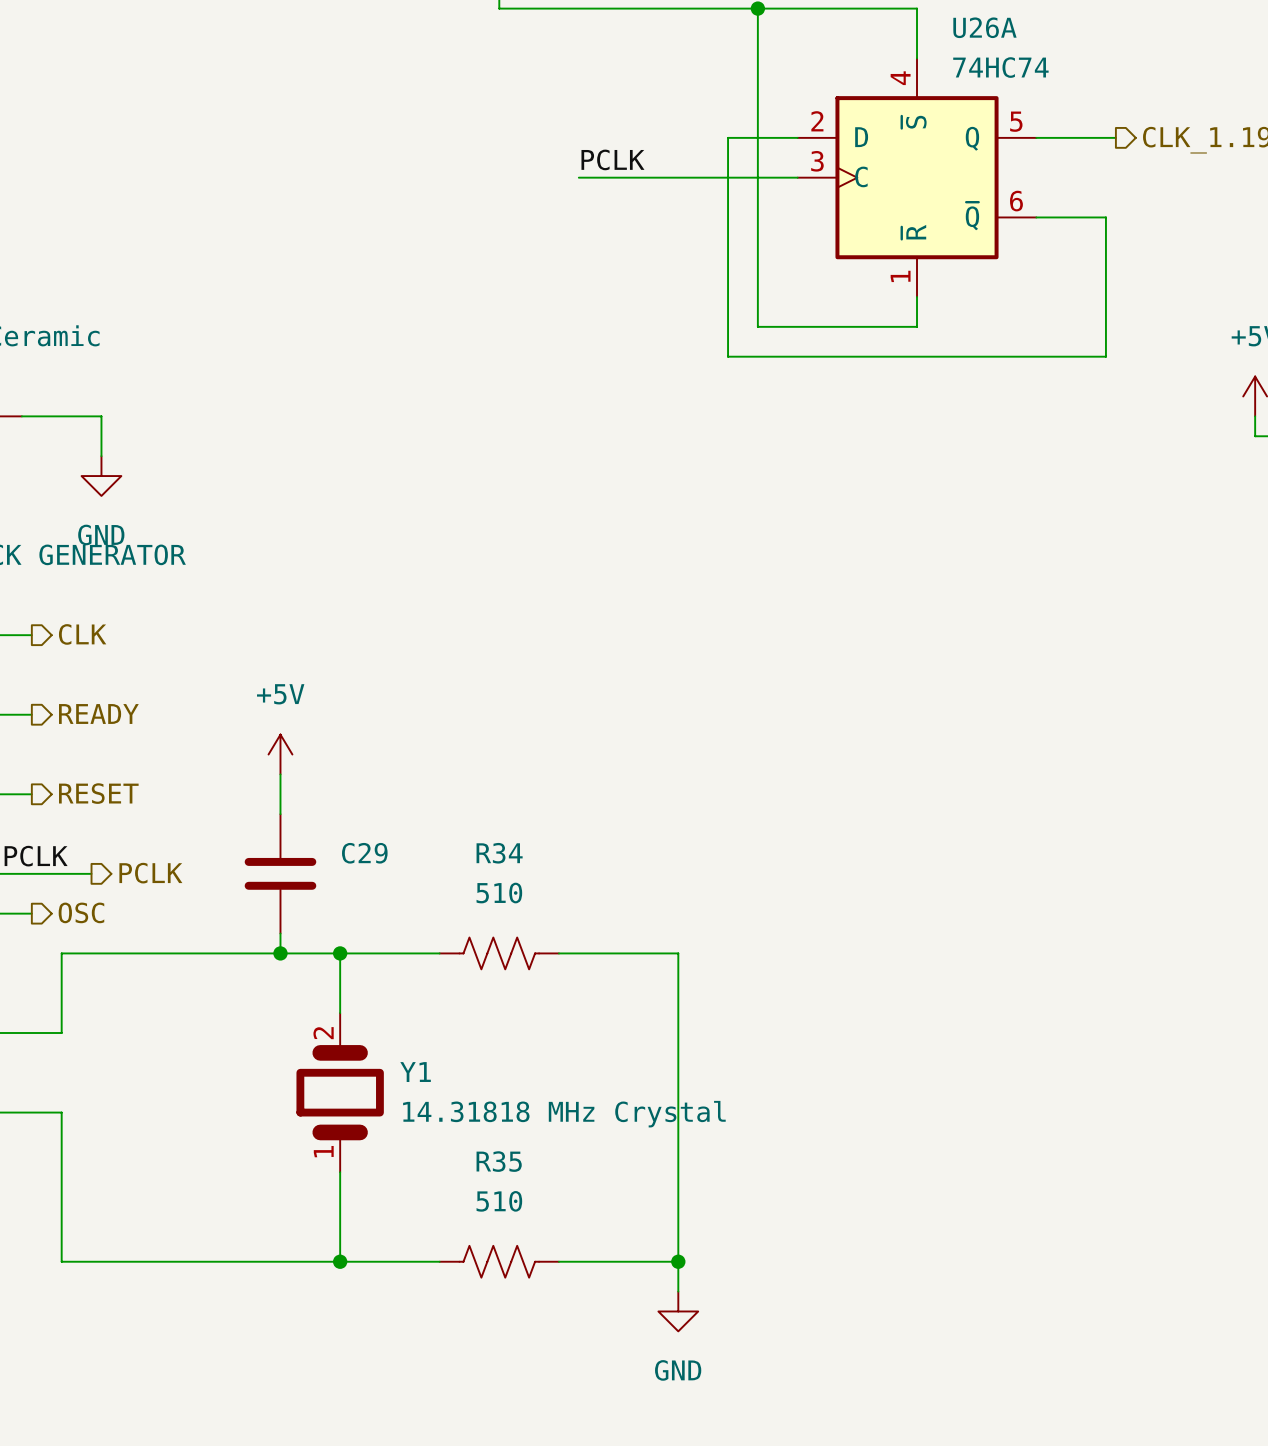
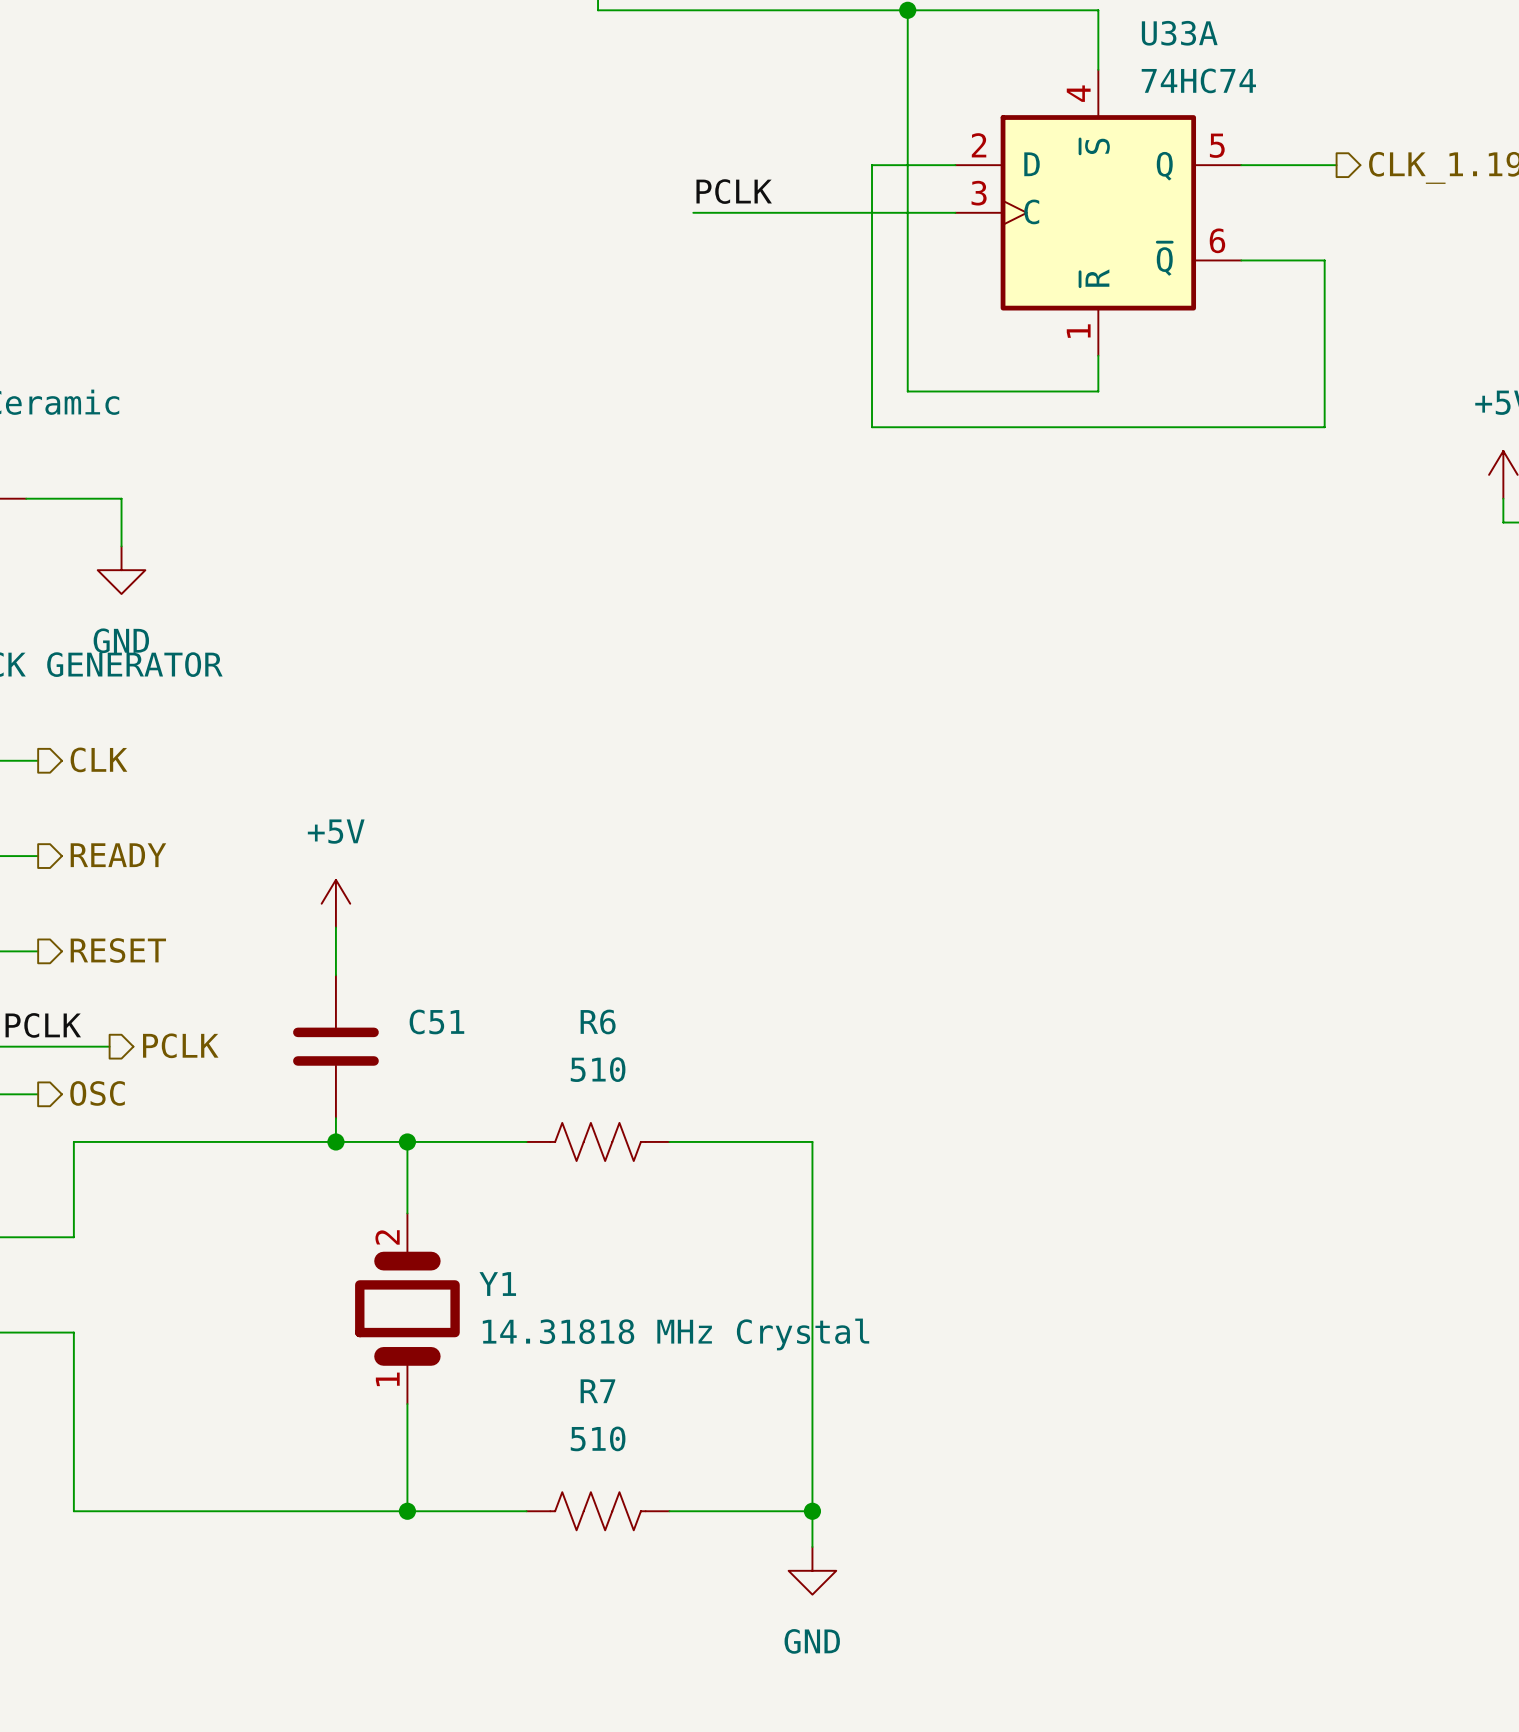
U26A name: U26A (984, 27) -> U33A (1179, 33)
C29 name: C29 (364, 853) -> C51 (436, 1021)
R34 name: R34 (499, 853) -> R6 (598, 1021)
R35 name: R35 (499, 1161) -> R7 (597, 1391)

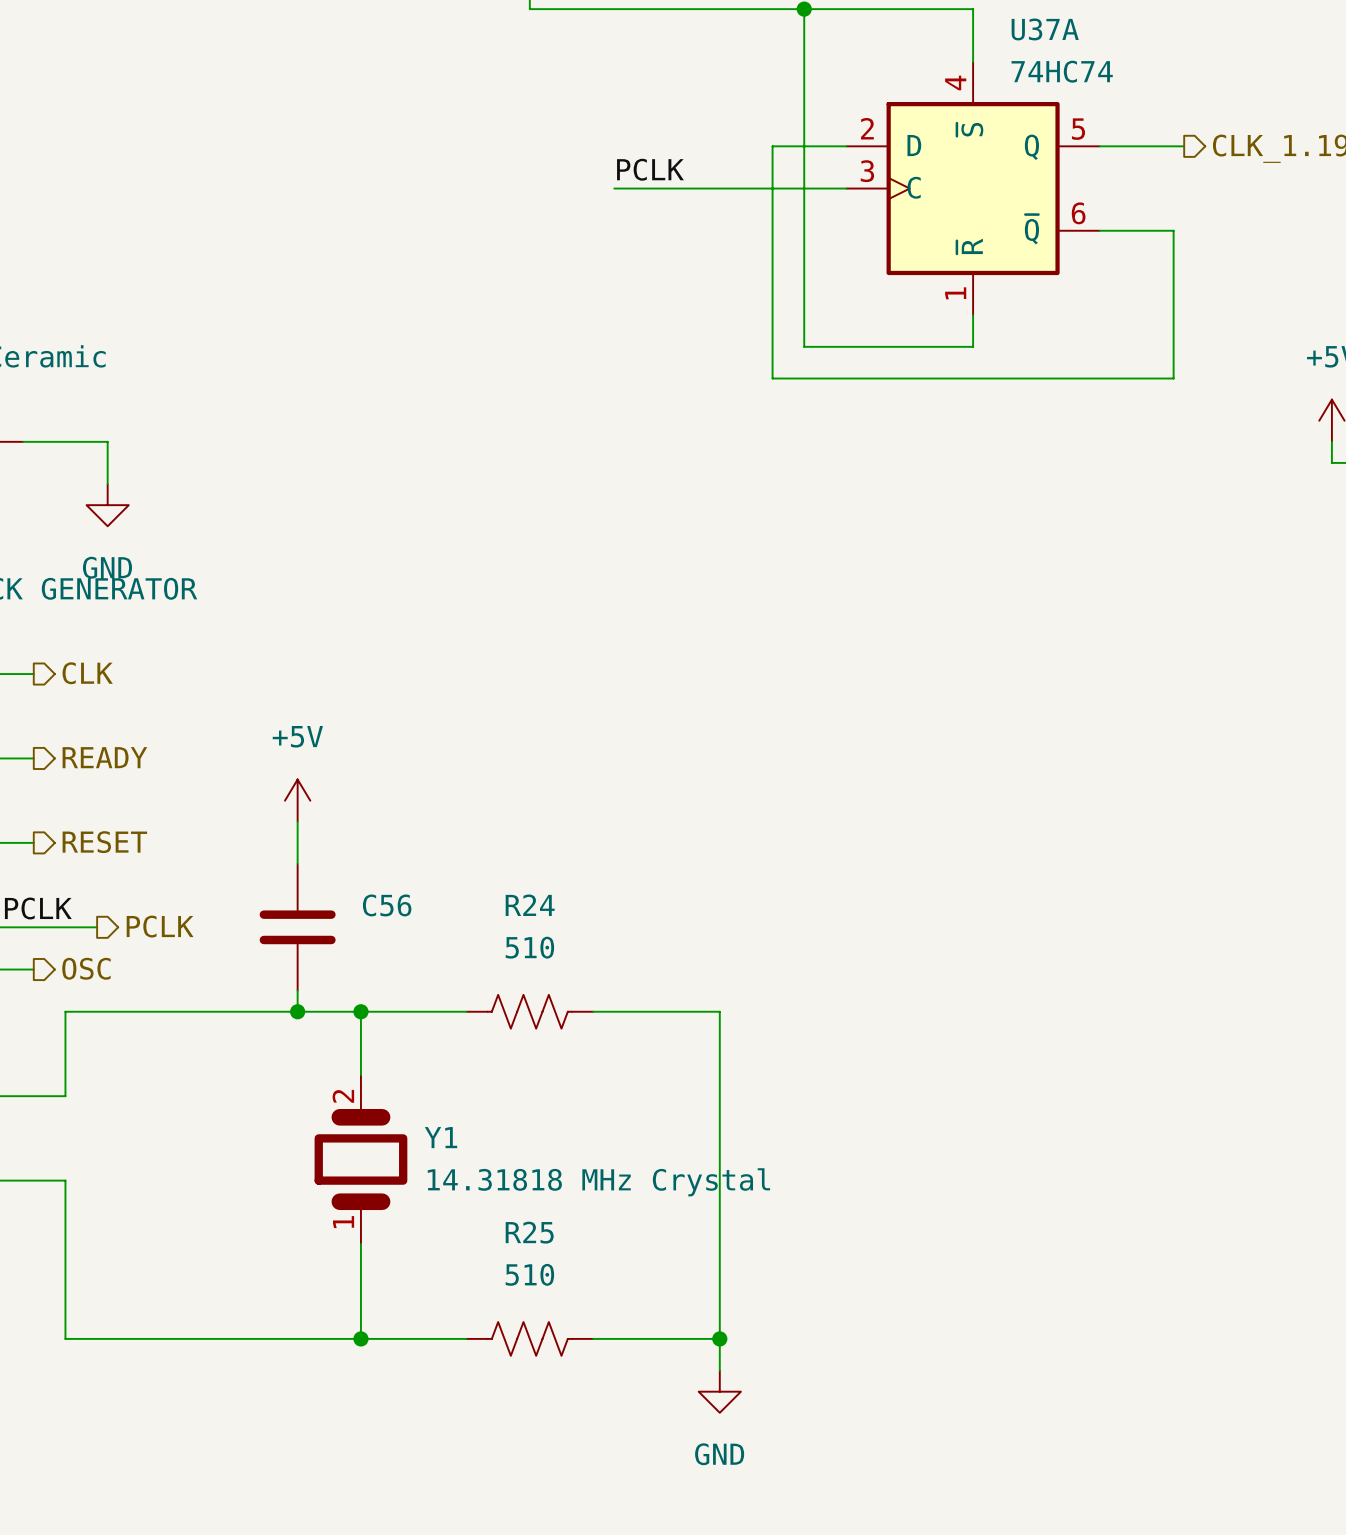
U33A name: U33A (1179, 33) -> U37A (1045, 29)
C51 name: C51 (436, 1021) -> C56 (387, 905)
R6 name: R6 (598, 1021) -> R24 (530, 905)
R7 name: R7 (597, 1391) -> R25 (529, 1232)

